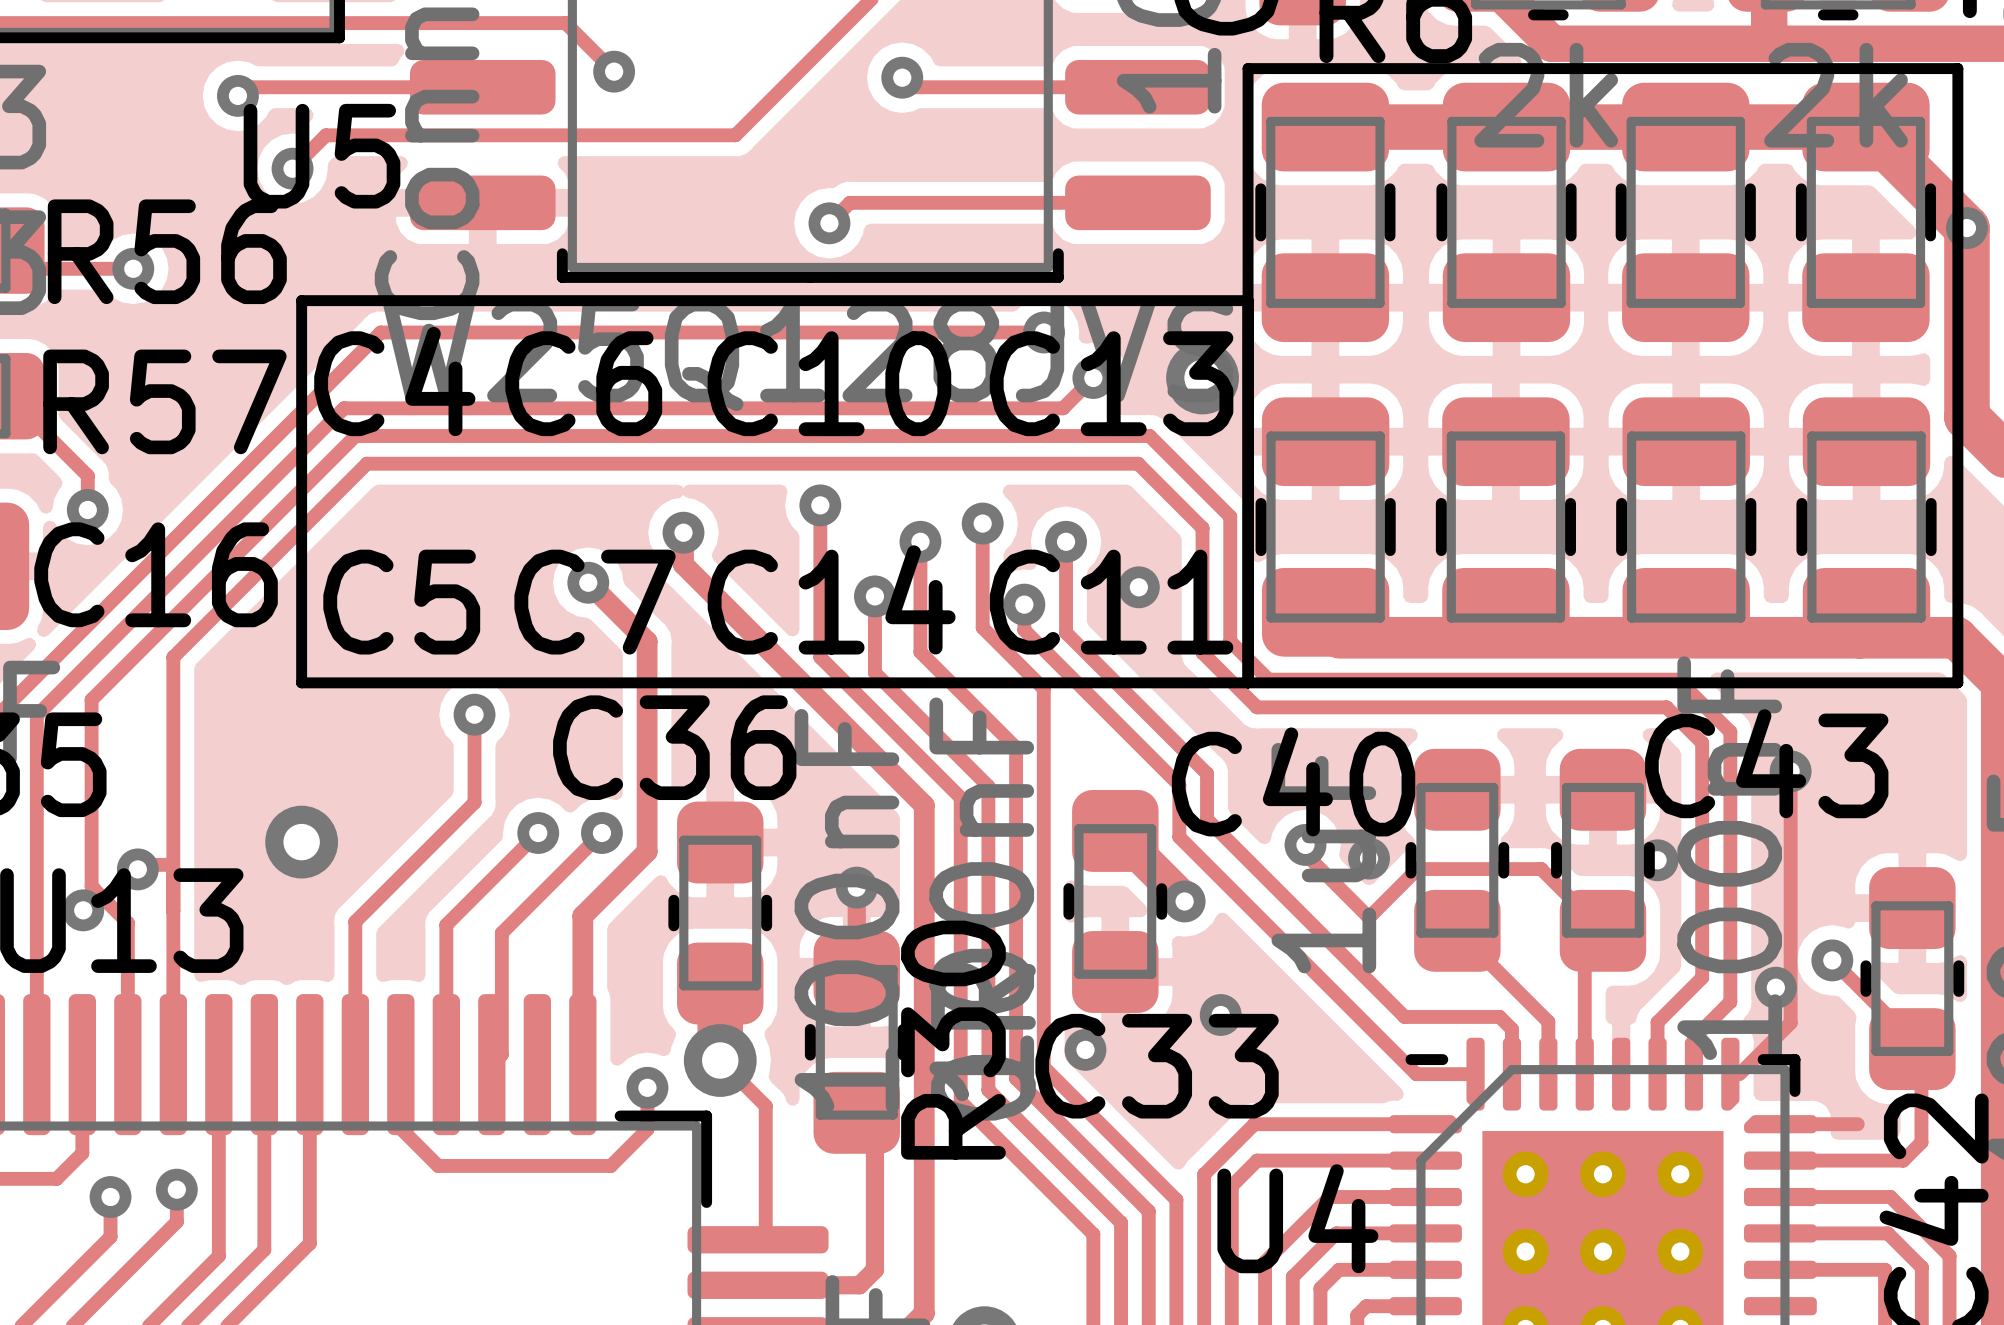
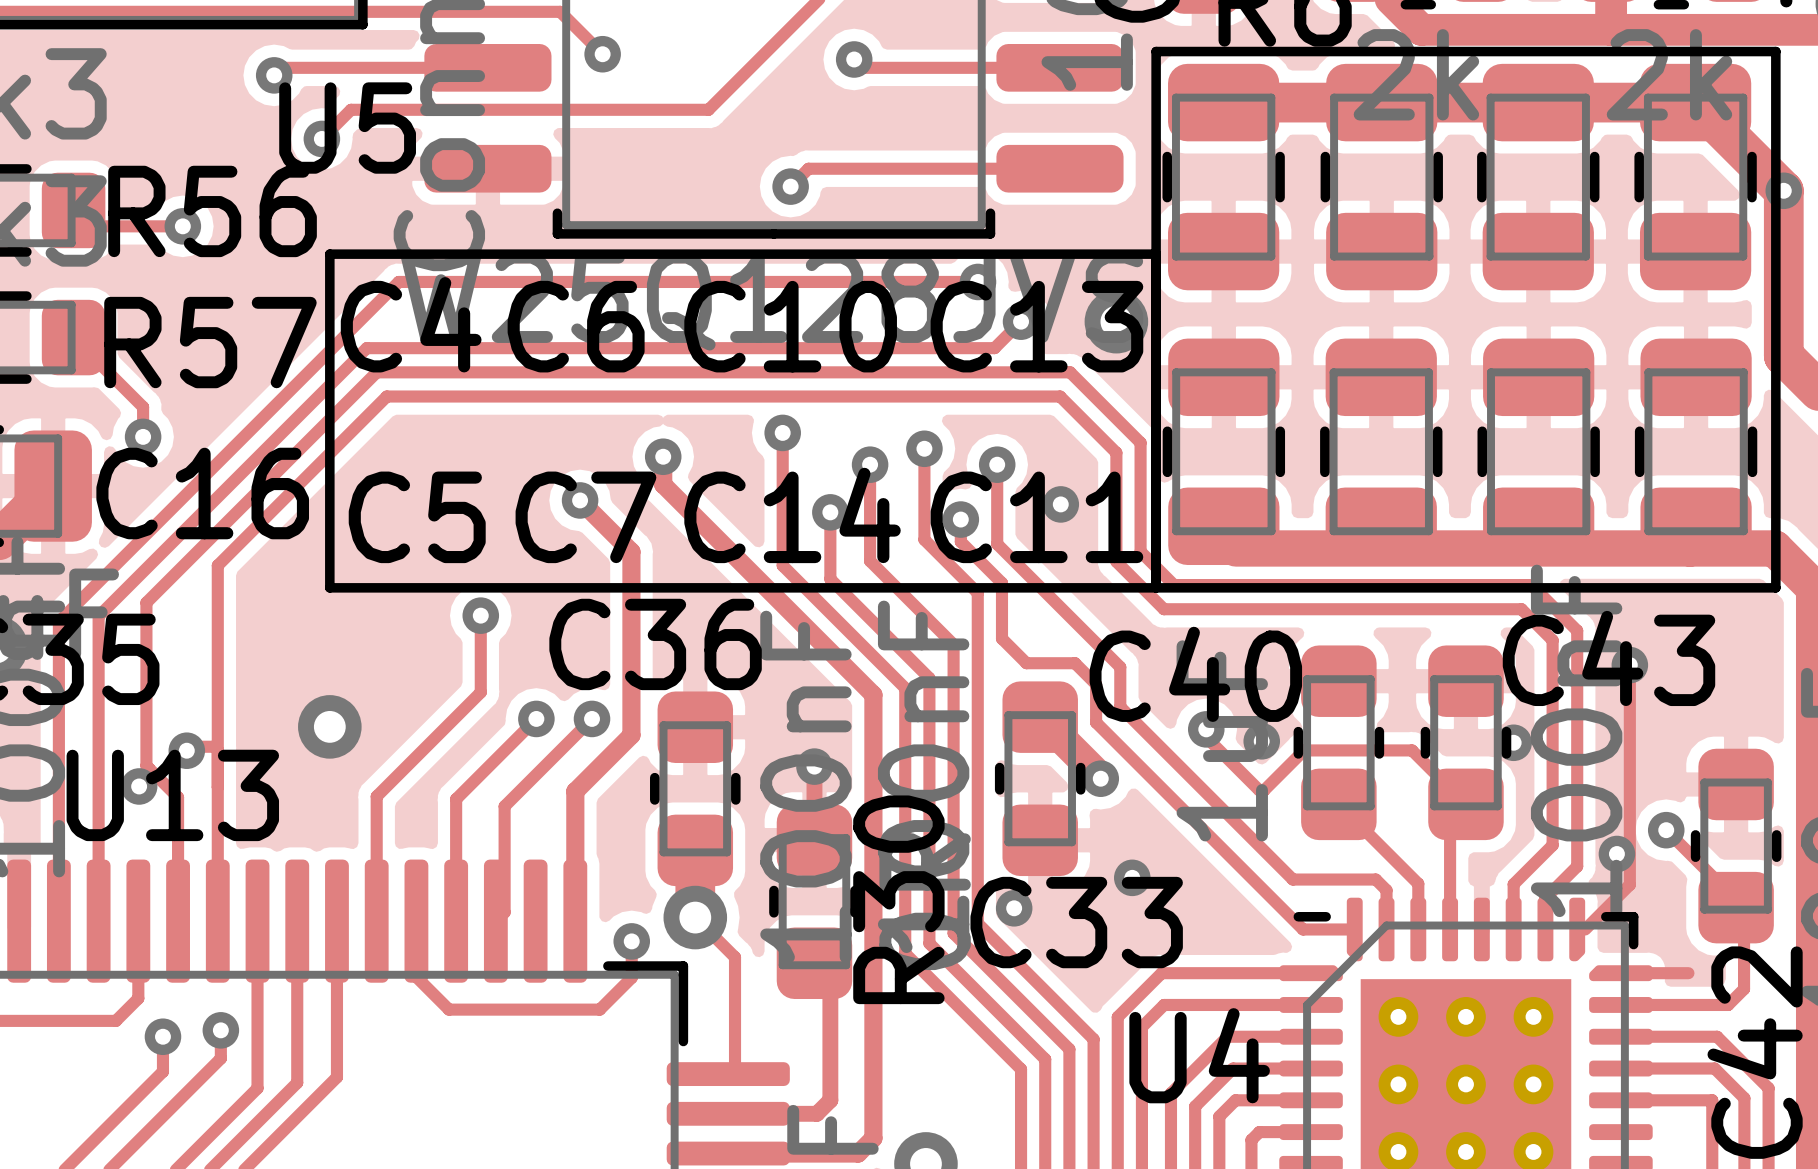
track: (1071, 677) (1179, 785) (1179, 793) -> (1001, 583) (1001, 638) (1026, 663) (1075, 663) (1096, 684)

